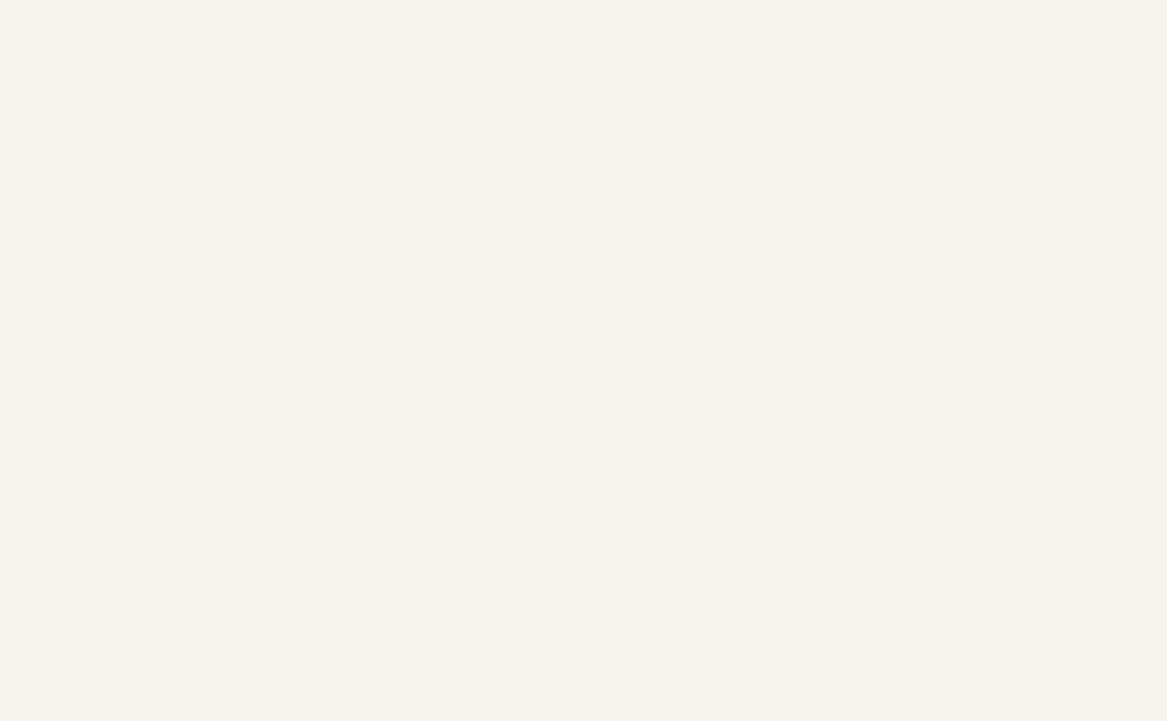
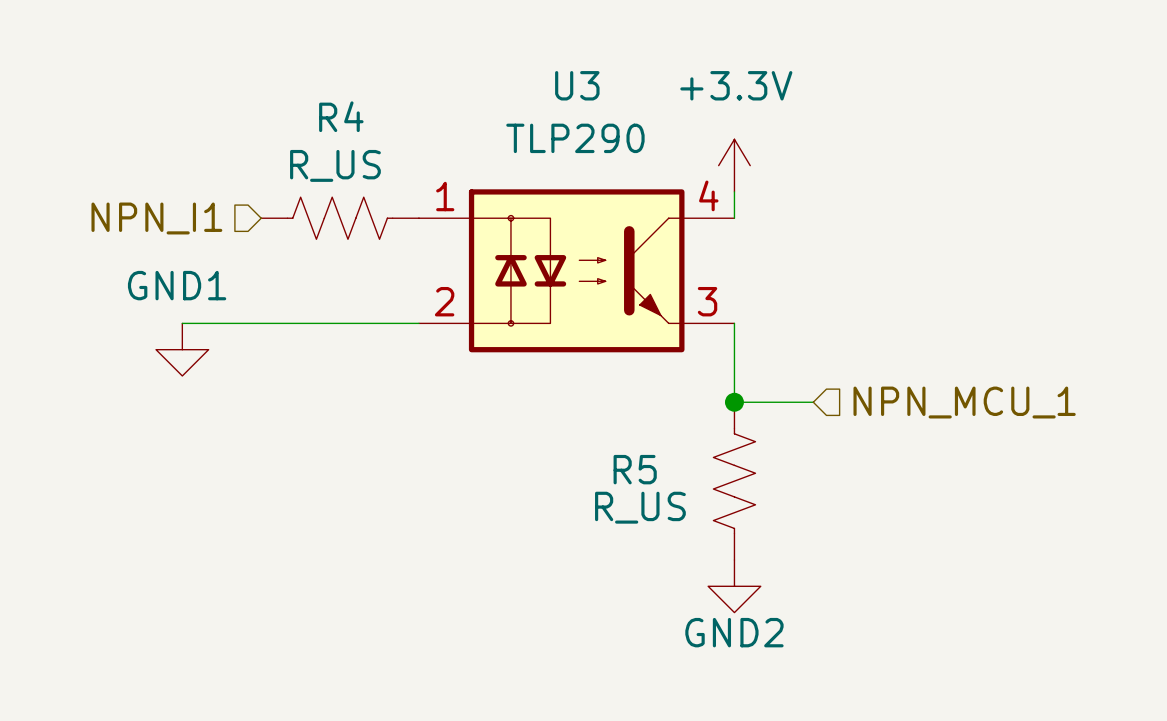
power symbol: none -> +3.3V (734, 165)
wire: none -> (734, 191) (734, 218)
hierarchical label: none -> NPN_I1 (156, 218)
R4: none -> R_US (340, 218)
U3: none -> TLP290 (576, 270)
wire: none -> (182, 323) (418, 323)
wire: none -> (734, 323) (734, 402) (813, 402)
power symbol: none -> GND1 (182, 349)
junction: none -> (734, 402)
hierarchical label: none -> NPN_MCU_1 (964, 402)
R5: none -> R_US (734, 481)
power symbol: none -> GND2 (734, 586)

